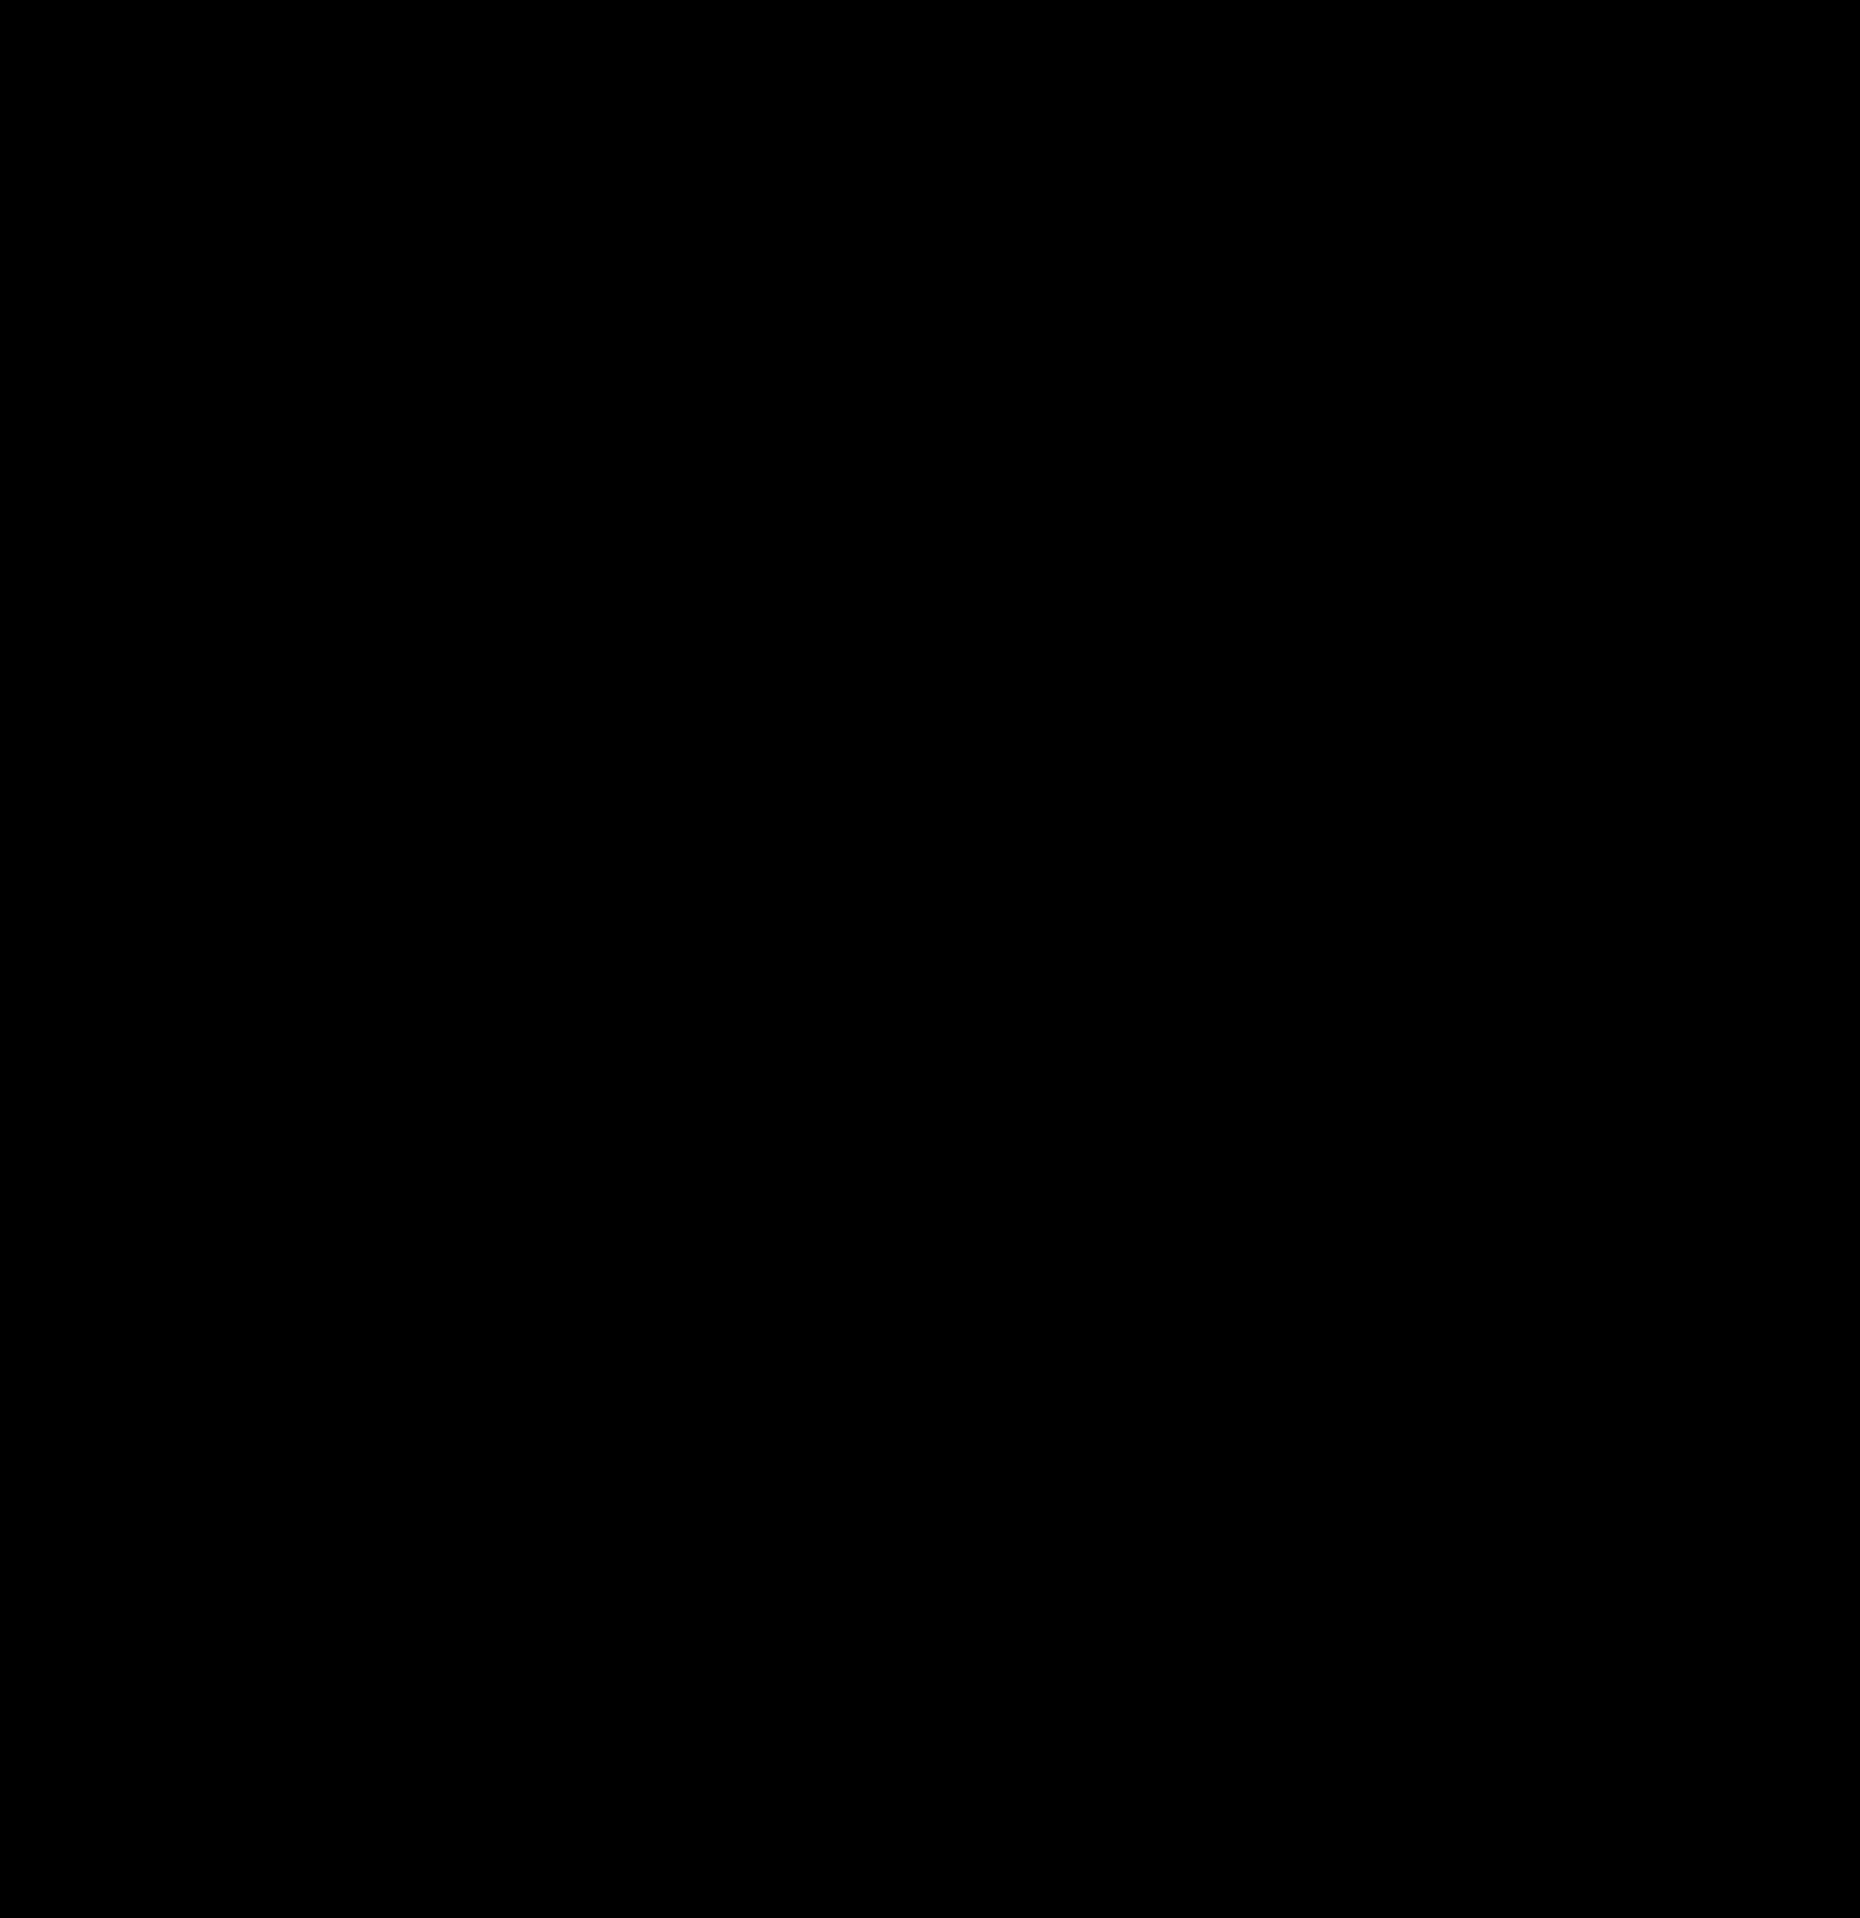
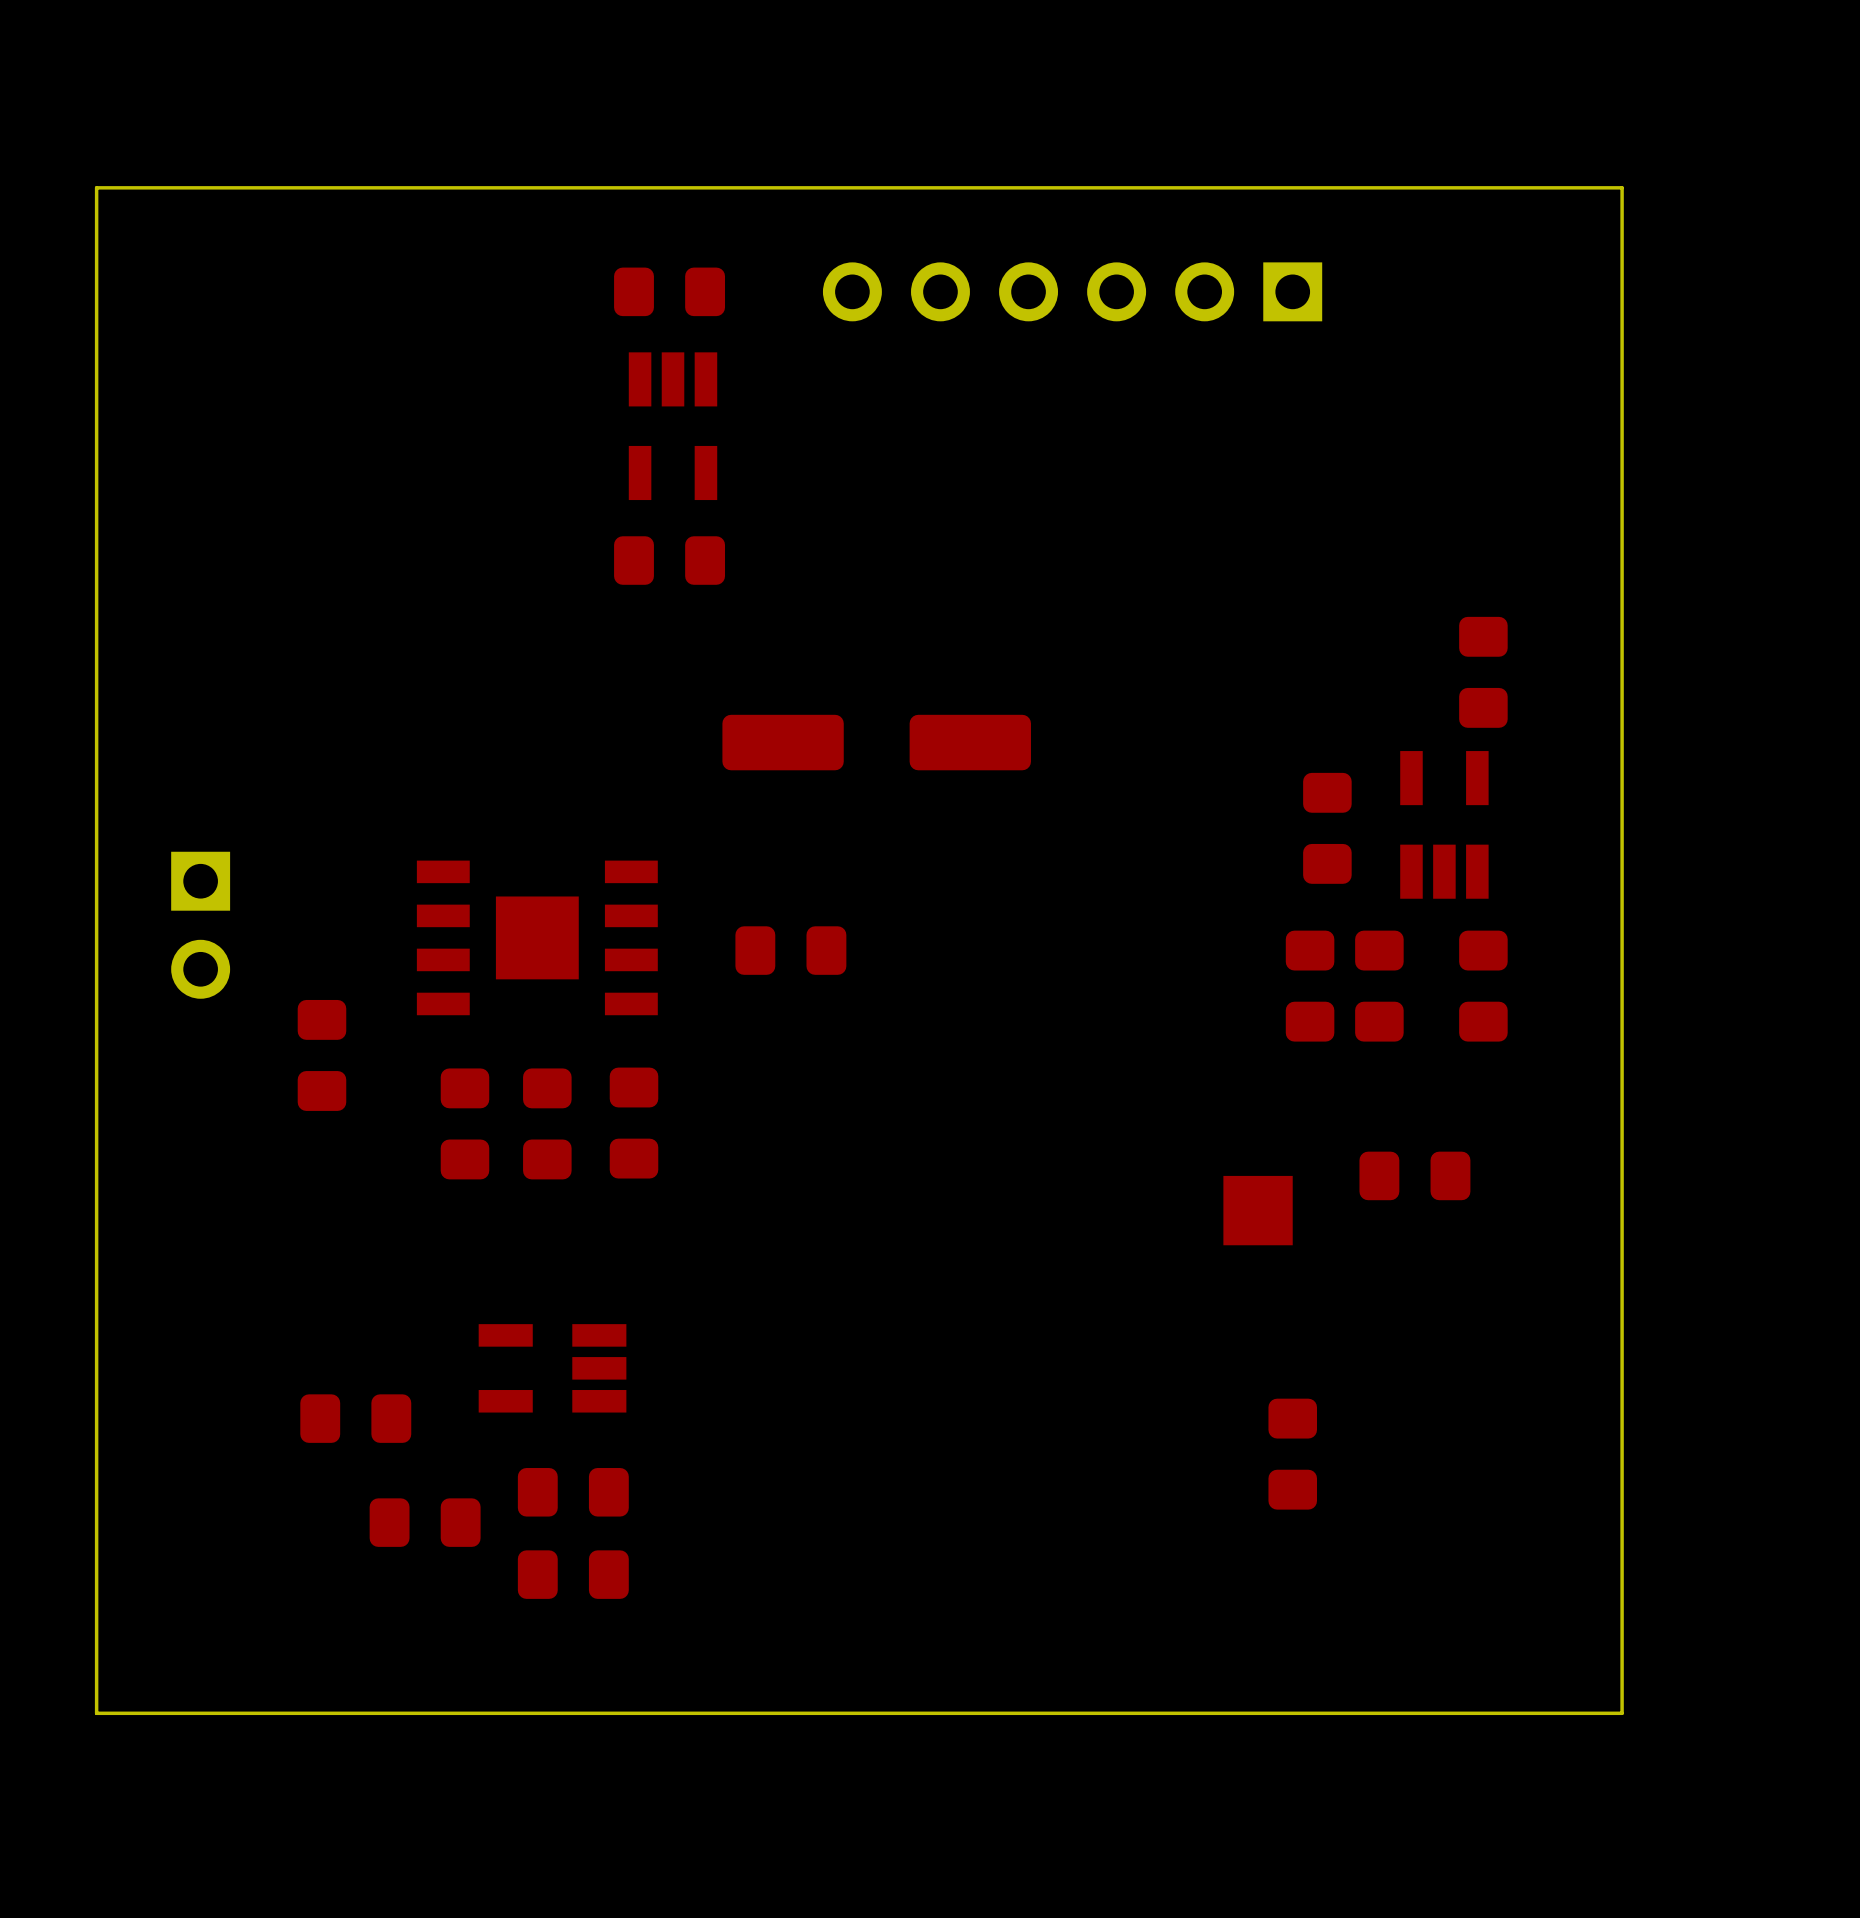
board edge: none -> (1622, 187) (96, 187) (96, 1713) (1622, 1713) (1622, 187)
part: none -> (669, 291)
part: none -> (1072, 291)
part: none -> (673, 426)
part: none -> (669, 560)
part: none -> (1483, 672)
part: none -> (876, 742)
part: none -> (1444, 824)
part: none -> (1327, 828)
part: none -> (200, 925)
part: none -> (537, 937)
part: none -> (790, 950)
part: none -> (1310, 986)
part: none -> (1379, 986)
part: none -> (1483, 986)
part: none -> (321, 1055)
part: none -> (464, 1123)
part: none -> (547, 1123)
part: none -> (634, 1123)
part: none -> (1414, 1175)
part: none -> (1258, 1210)
part: none -> (552, 1368)
part: none -> (355, 1418)
part: none -> (1292, 1454)
part: none -> (573, 1492)
part: none -> (425, 1522)
part: none -> (573, 1574)

